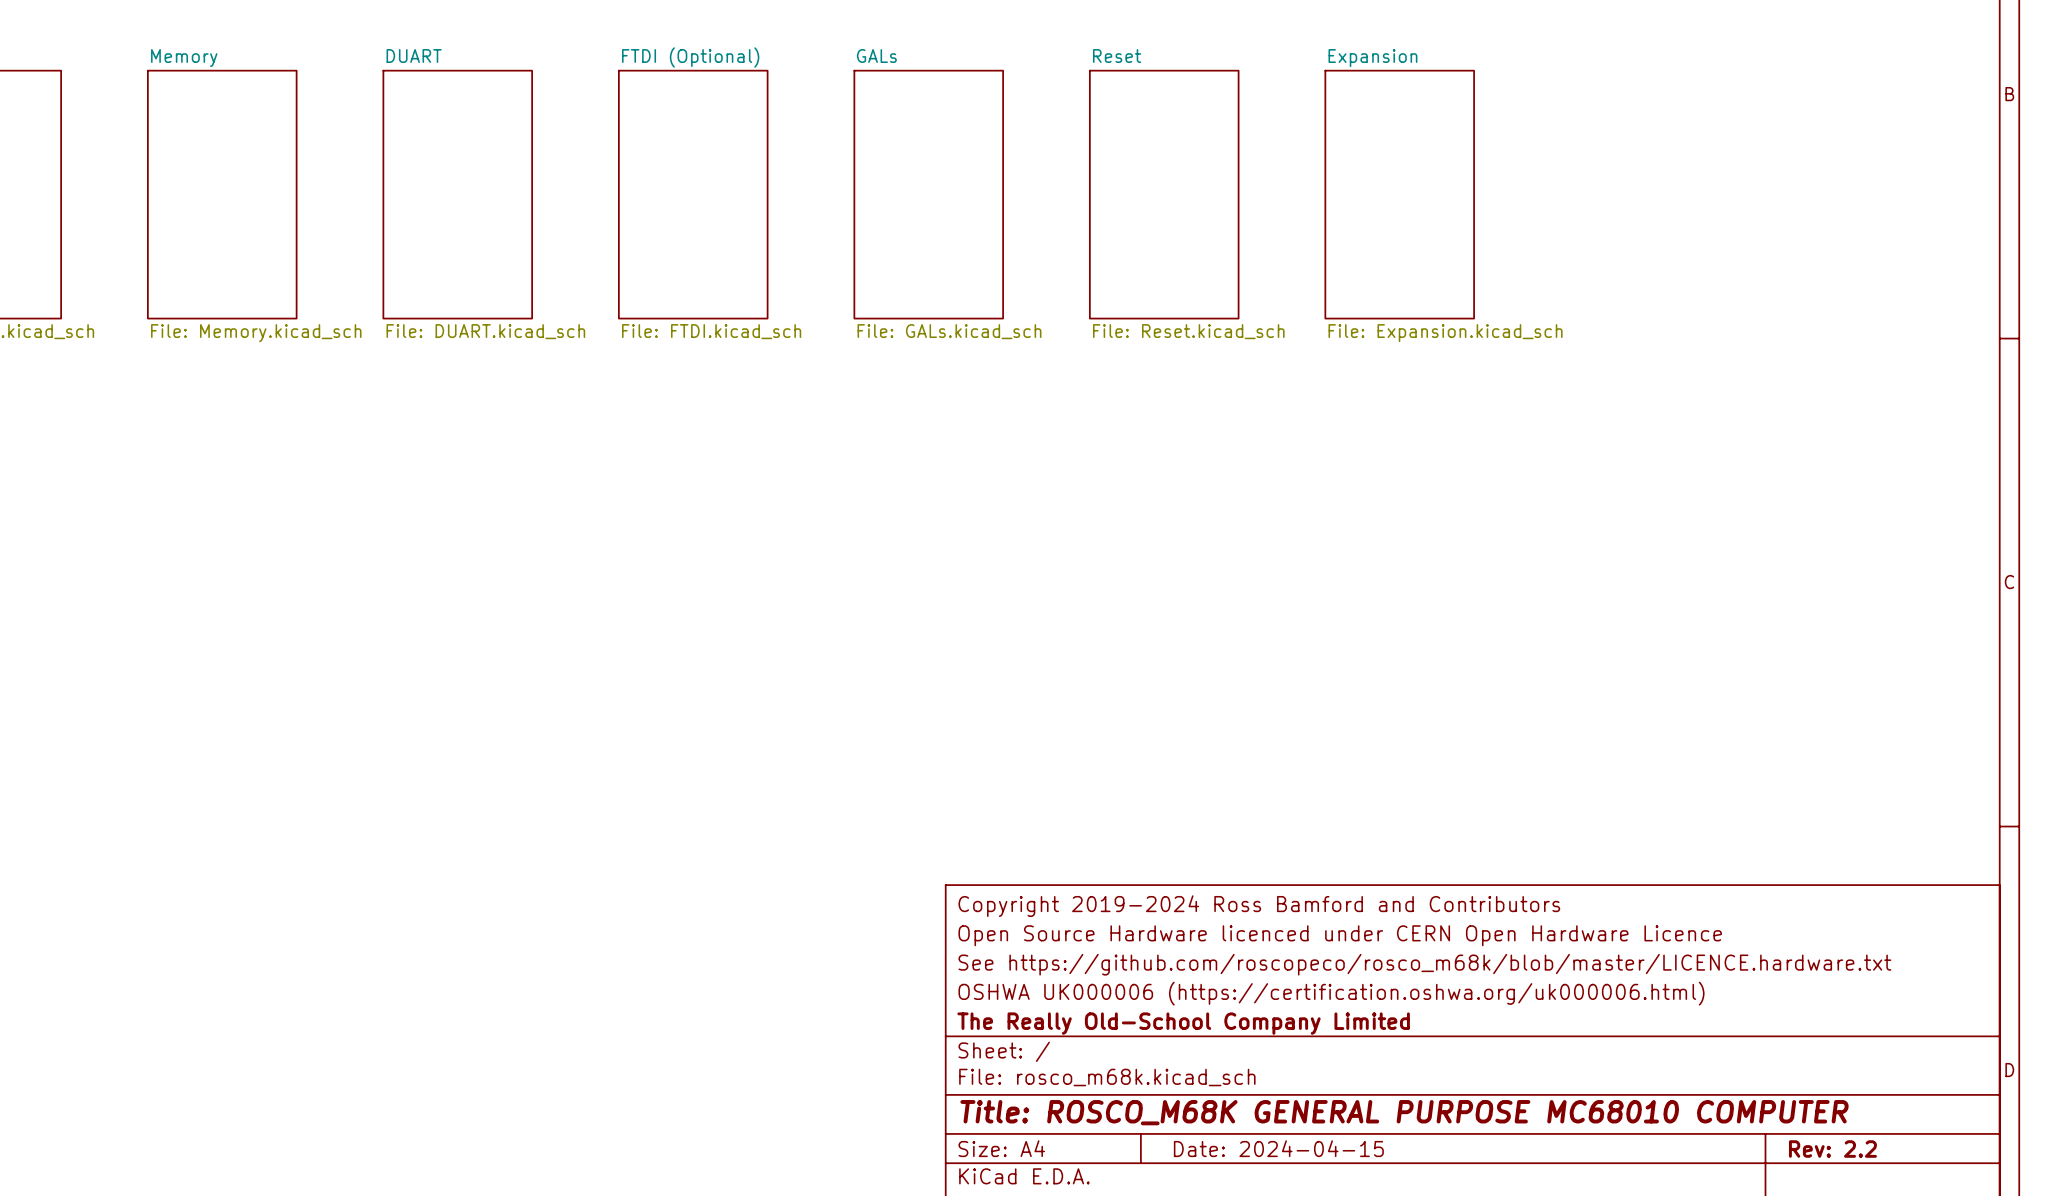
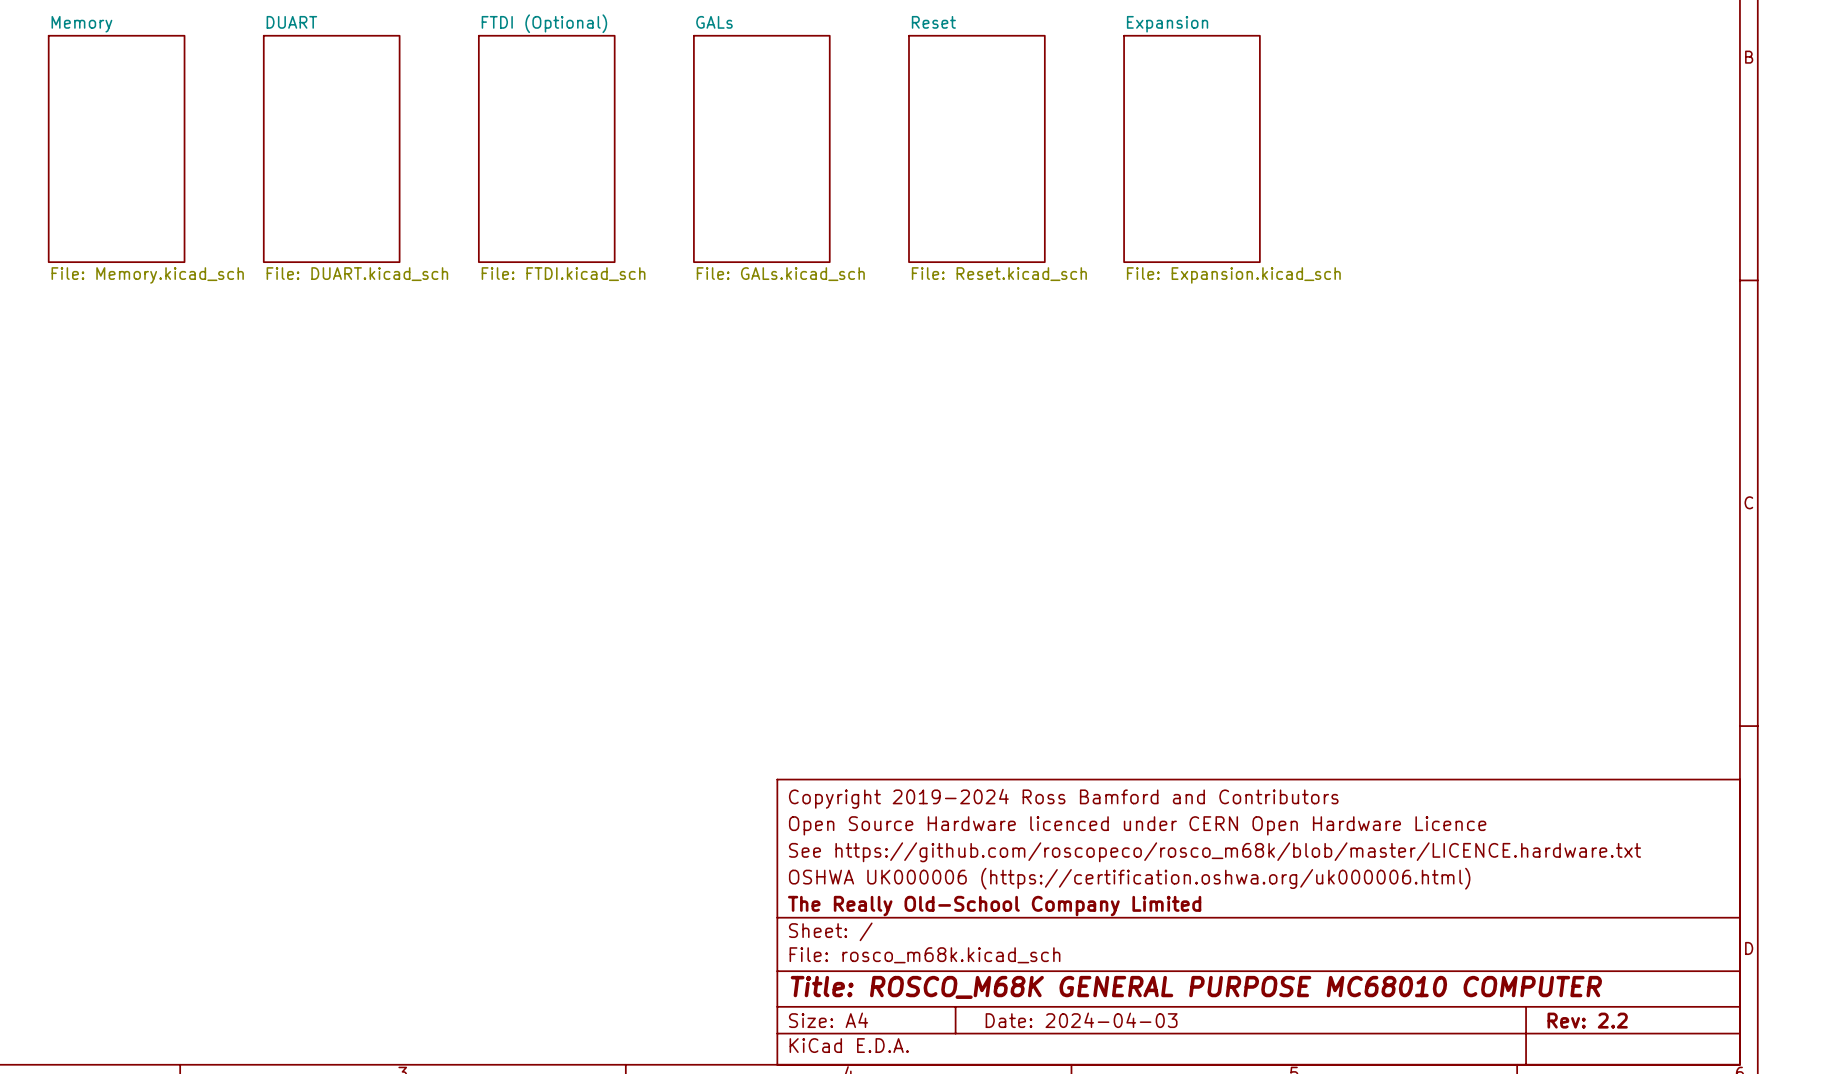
title block: Date: 2024-04-15 (1278, 1148) -> Date: 2024-04-03 (1081, 1020)

